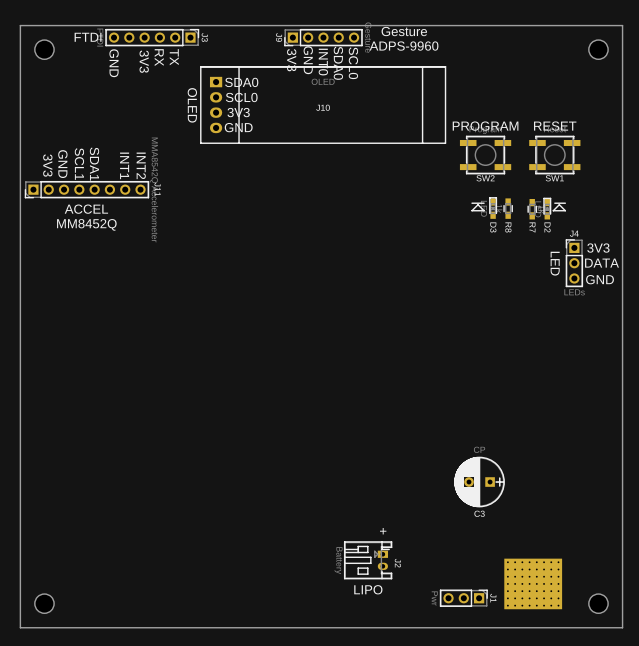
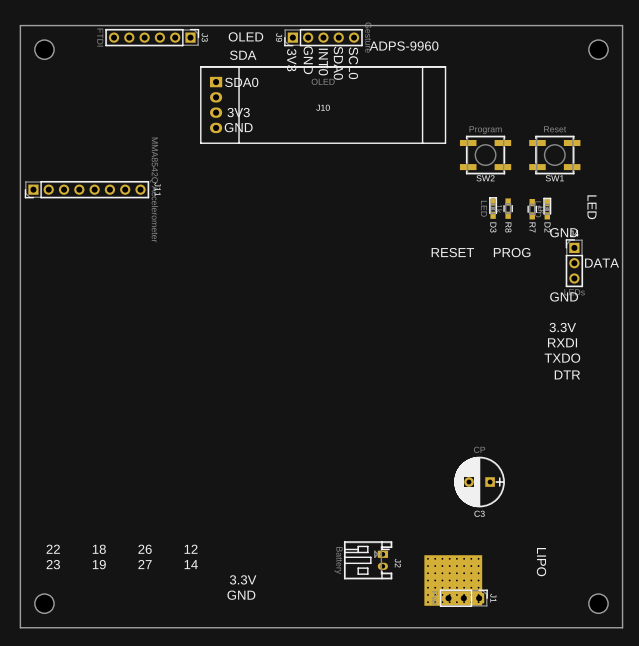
text: Gesture (404, 31) -> none
text: FTDI (88, 37) -> none
text: none -> SDA (243, 55)
text: RX (159, 57) -> none
text: TX (174, 57) -> none
text: 3V3 (144, 61) -> none
text: GND (114, 63) -> none
text: SCL0 (241, 97) -> none
text rotation: 0° (192, 105) -> 90° counterclockwise (245, 36)
text position: OLED (192, 105) -> OLED (245, 36)
text: PROGRAM (485, 126) -> none
text: RESET (555, 126) -> none
text: GND (62, 164) -> none
text: SCL1 (79, 164) -> none
text: SDA1 (94, 164) -> none
text: 3V3 (47, 165) -> none
text: INT1 (124, 165) -> none
text: INT2 (141, 165) -> none
line: (484, 203) (472, 203) -> none
line: (565, 203) (554, 203) -> none
line: (478, 204) (472, 210) (484, 210) (478, 204) -> none
line: (559, 204) (565, 210) (553, 210) (559, 204) -> none
text: ACCEL (86, 209) -> none
text: MM8452Q (86, 224) -> none
text: none -> GND (564, 232)
text: 3V3 (598, 248) -> none
text: none -> RESET (452, 252)
text: none -> PROG (512, 252)
text position: LED (555, 263) -> LED (591, 207)
text: GND (599, 279) -> none
text: none -> GND (564, 296)
text: none -> 3.3V (562, 327)
text: none -> RXDI (562, 342)
text: none -> TXDO (562, 358)
text: none -> DTR (567, 374)
text: + (383, 531) -> none
text: none -> 22 (53, 549)
text: none -> 18 (99, 549)
text: none -> 26 (145, 549)
text: none -> 12 (191, 549)
text: none -> LIPO (541, 562)
text: none -> 23 (53, 564)
text: none -> 19 (99, 564)
text: none -> 27 (145, 564)
text: none -> 14 (191, 564)
text: none -> 3.3V (243, 579)
part position: (533, 583) -> (453, 580)
text: LIPO (368, 589) -> none
text: none -> GND (241, 595)

